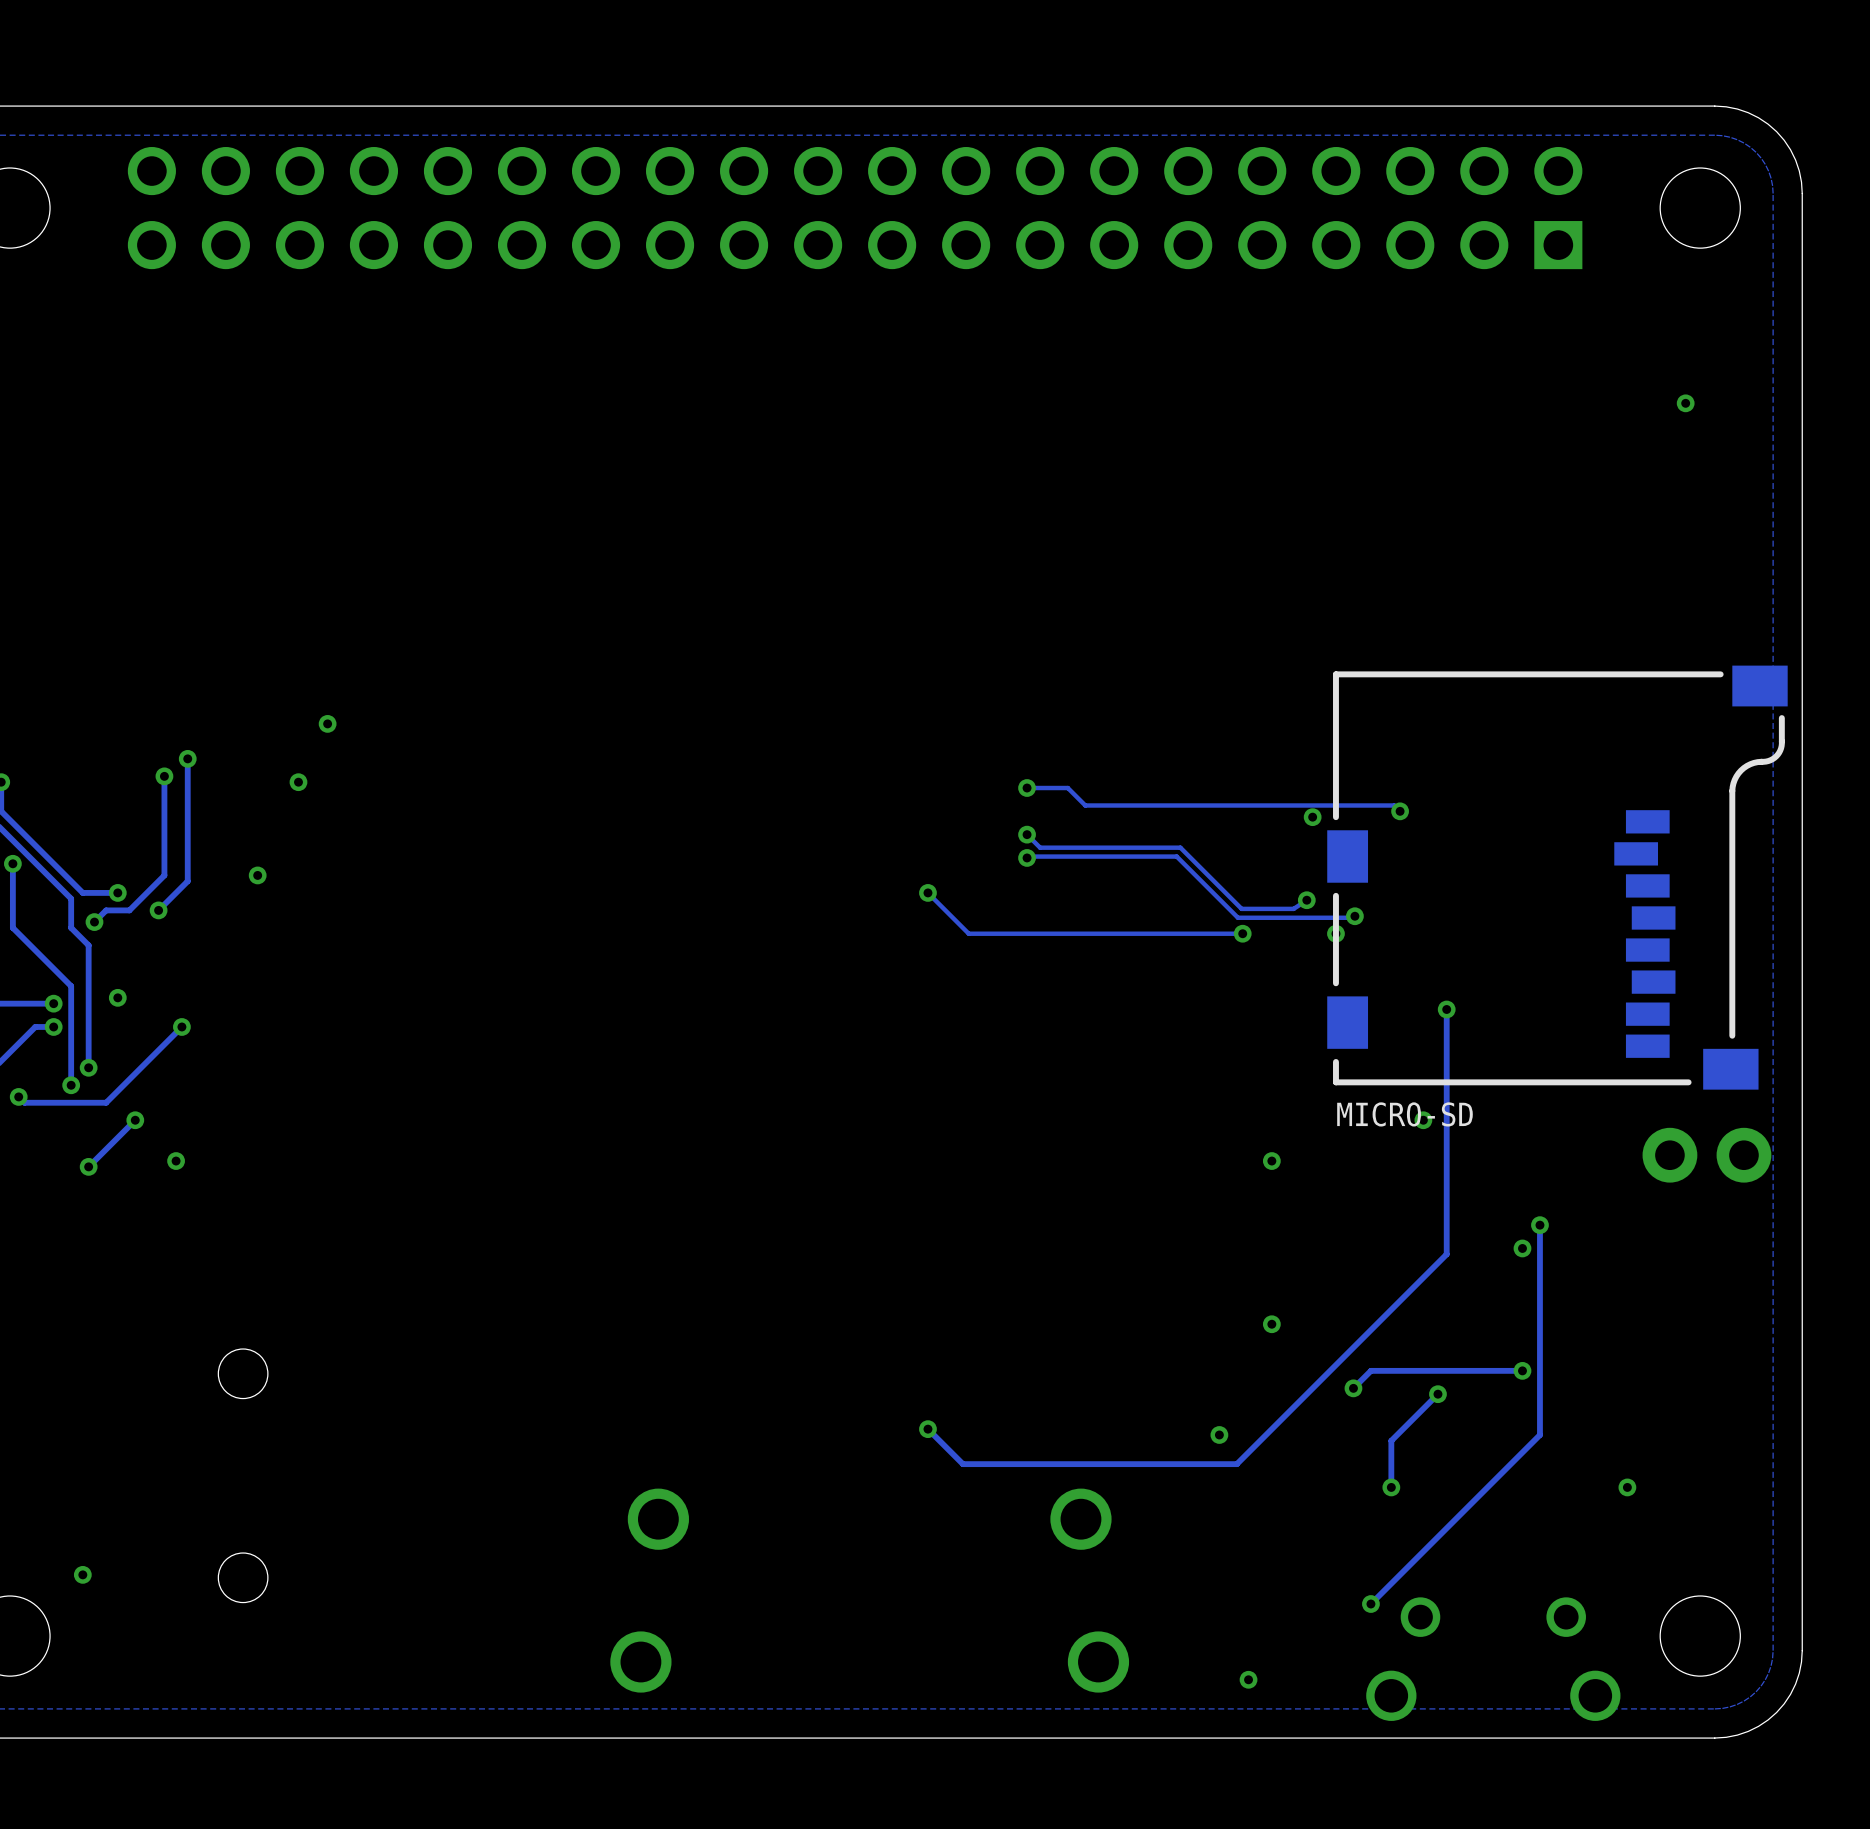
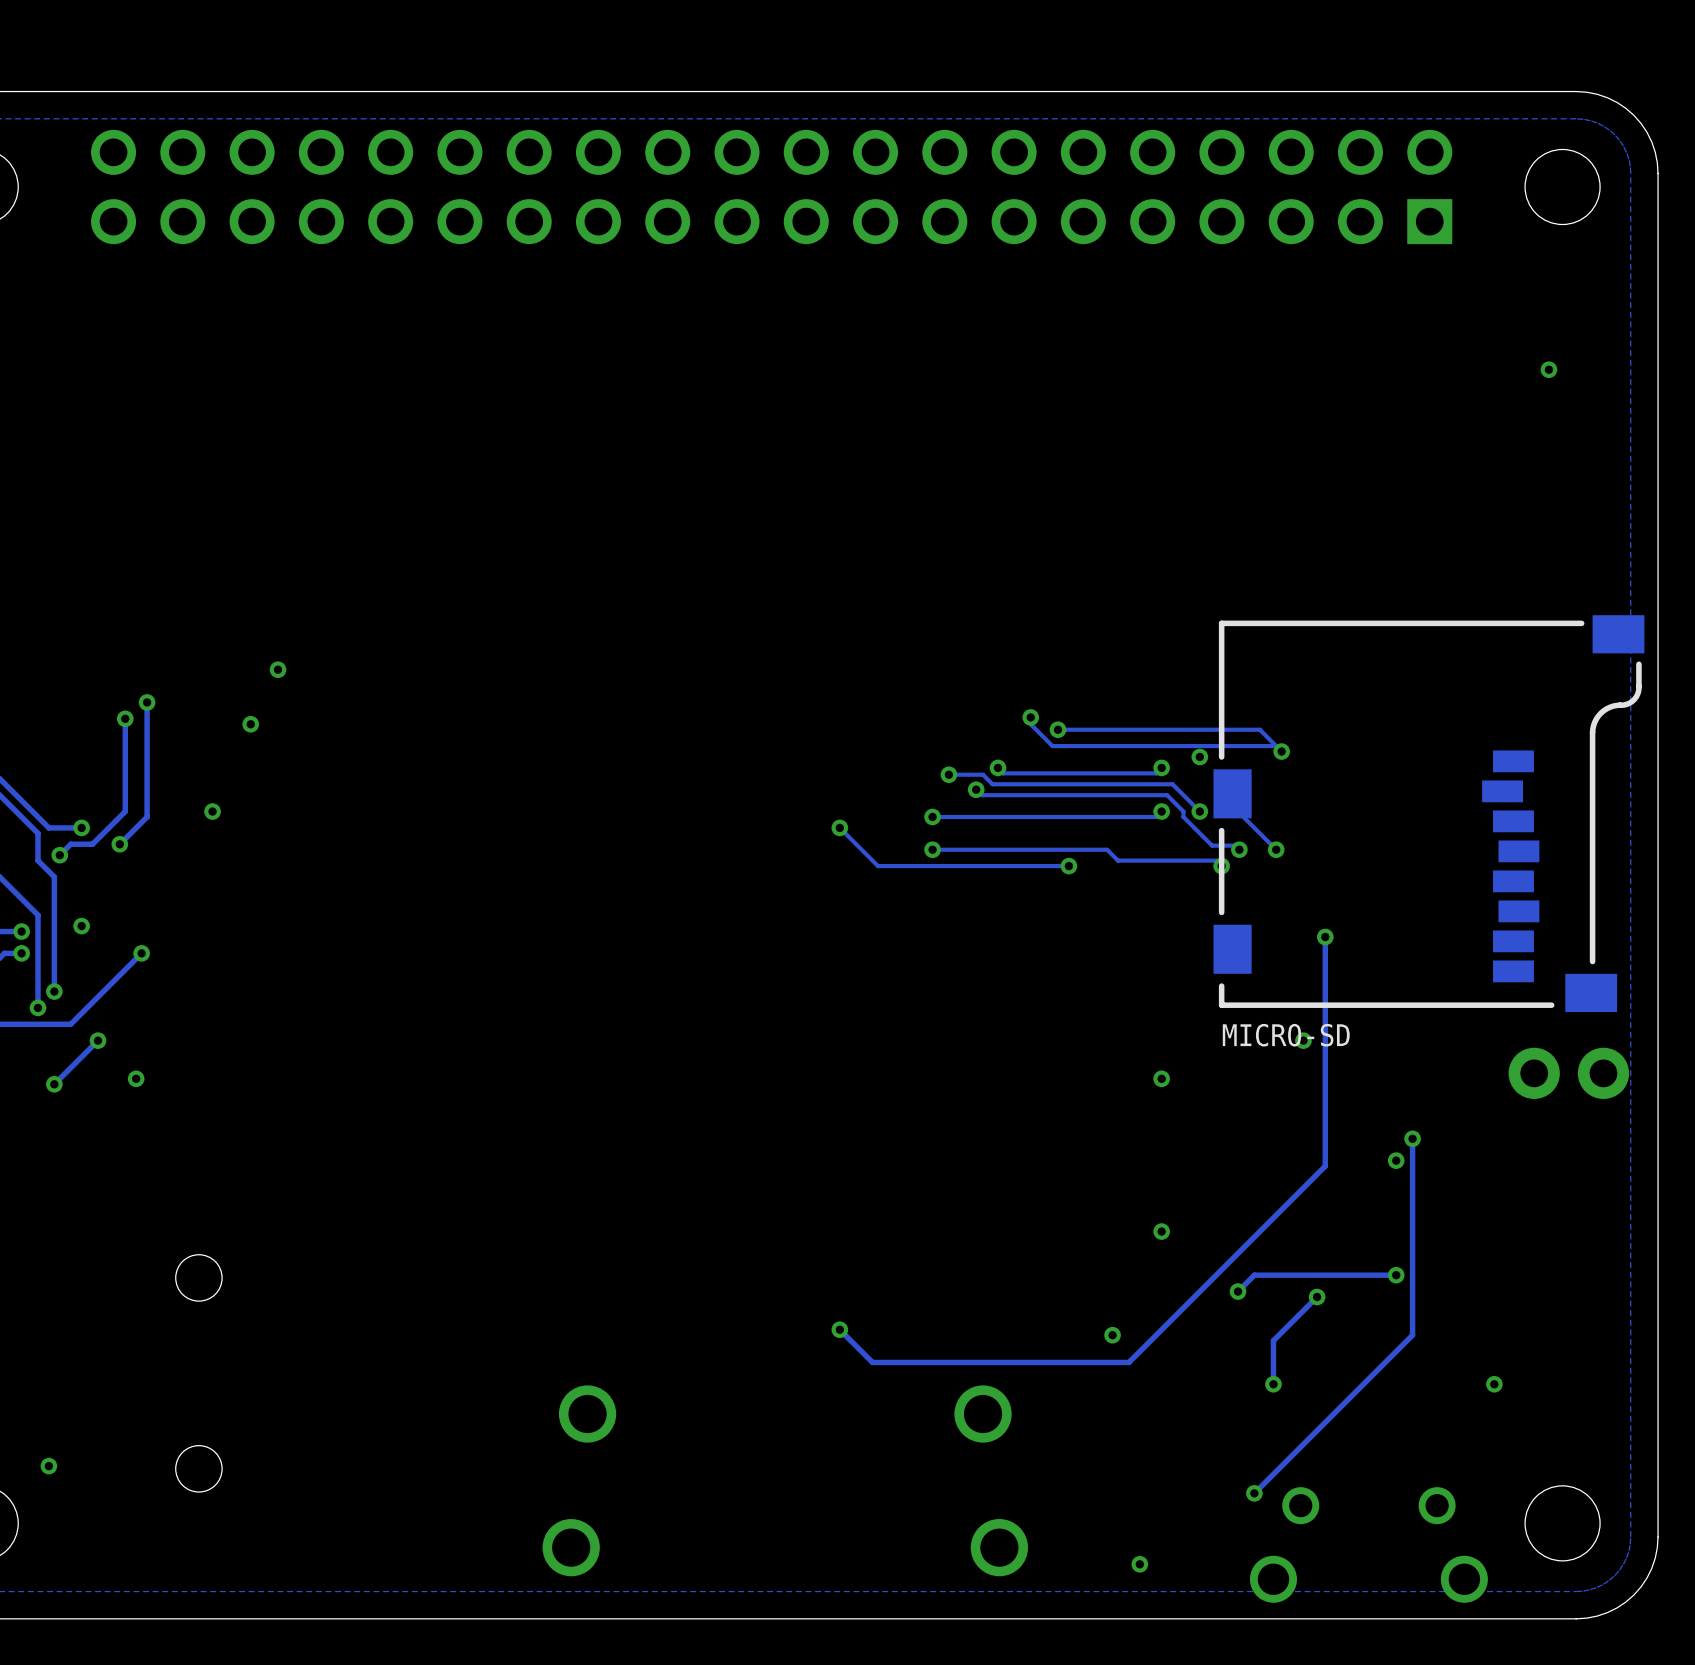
via: none -> (1030, 717)
track: (1027, 788) (1067, 788) (1085, 805) (1155, 805) -> (1030, 717) (1030, 724) (1052, 746)
via: (1027, 788) -> none
track: none -> (1058, 729) (1259, 729) (1276, 746)
via: none -> (1058, 729)
via: none -> (998, 767)
track: none -> (1161, 767) (1160, 771) (1156, 773) (1003, 773) (999, 771) (998, 767)
via: none -> (1161, 767)
track: (1027, 834) (1040, 847) (1180, 847) (1241, 908) (1293, 908) (1306, 900) -> none
via position: (1027, 834) -> (948, 774)
track: none -> (948, 774) (983, 774) (992, 784) (1172, 784) (1199, 811)
track: none -> (976, 789) (981, 795) (1167, 795) (1183, 811) (1183, 817) (1212, 845) (1238, 845)
via: none -> (976, 789)
track: none -> (1232, 793) (1232, 806) (1276, 849)
track: (1027, 857) (1176, 856) (1237, 917) (1354, 916) -> none
via: (1027, 857) -> none
track: none -> (1161, 811) (1156, 817) (932, 817)
via: none -> (1161, 811)
via: none -> (1199, 811)
via: none -> (932, 817)
via: (1306, 900) -> none
track: none -> (932, 849) (1107, 849) (1118, 860) (1221, 860)
via: none -> (932, 849)
via: none -> (1276, 849)
via: none -> (1068, 866)
track: (1242, 933) (1172, 933) -> none
via: (1242, 933) -> none

